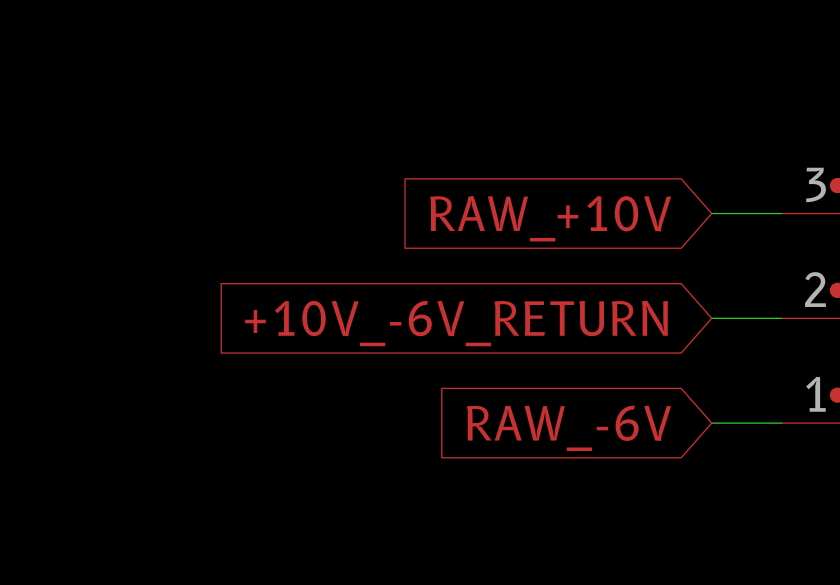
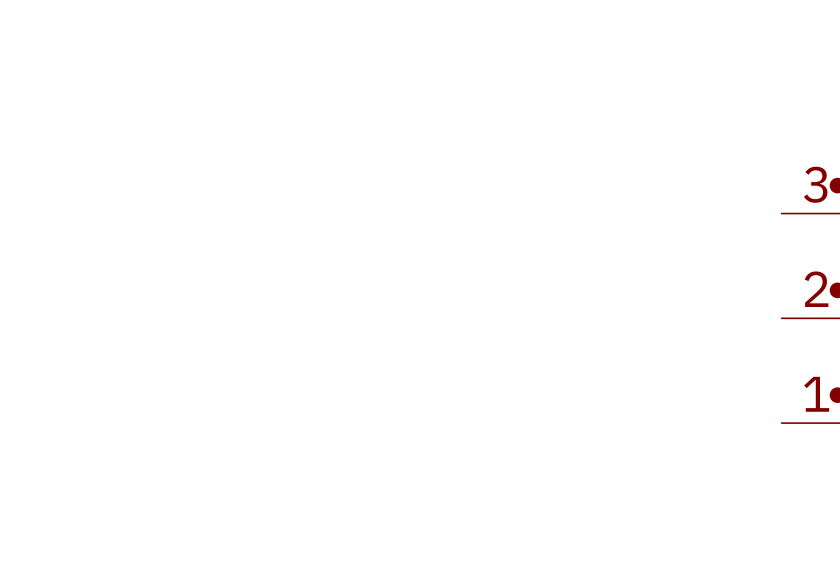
wire: (711, 213) (781, 213) -> none
global label: RAW_+10V (550, 218) -> none
wire: (711, 318) (781, 318) -> none
global label: +10V_-6V_RETURN (456, 323) -> none
wire: (711, 423) (781, 423) -> none
global label: RAW_-6V (569, 428) -> none

